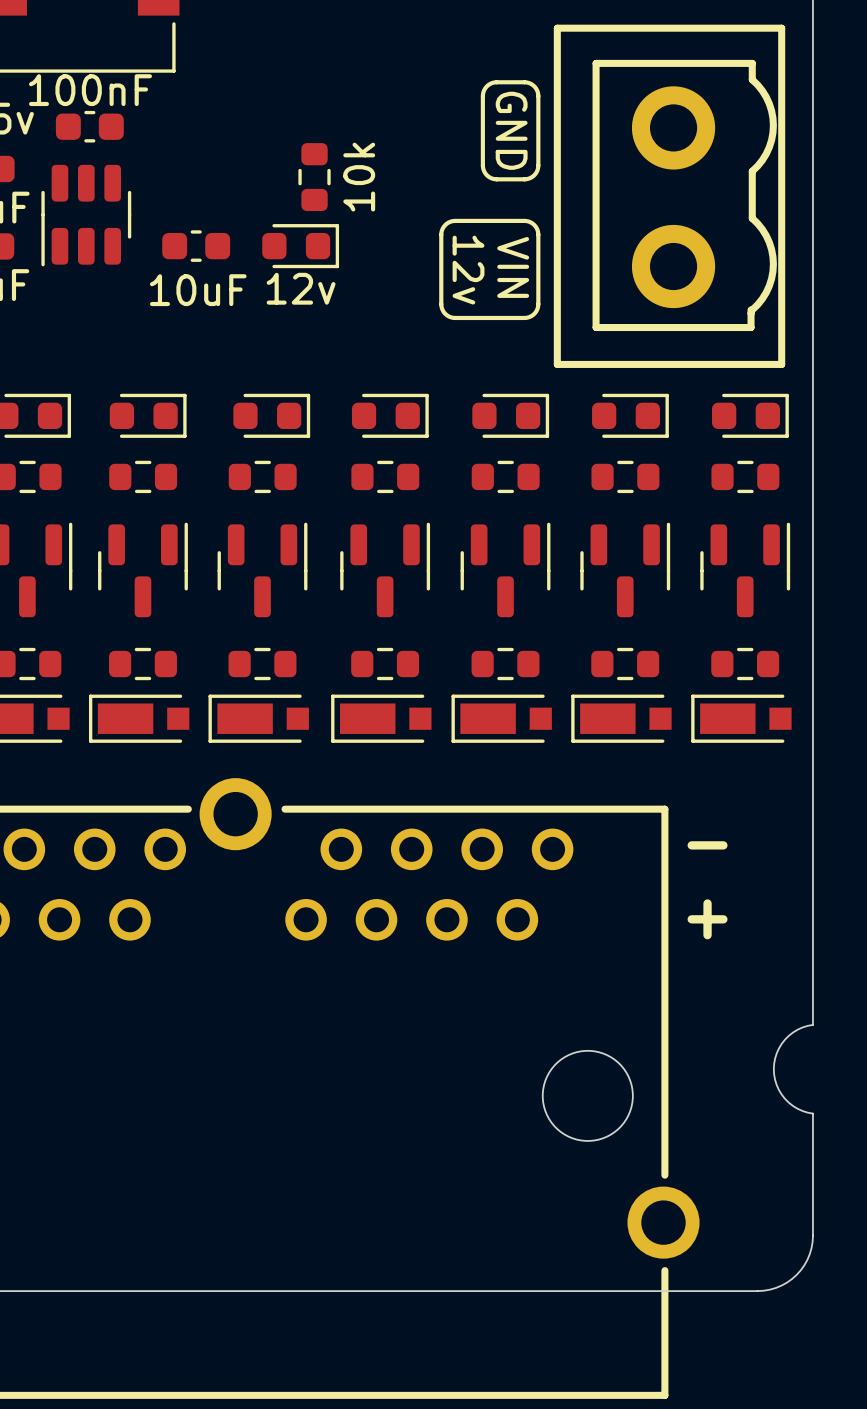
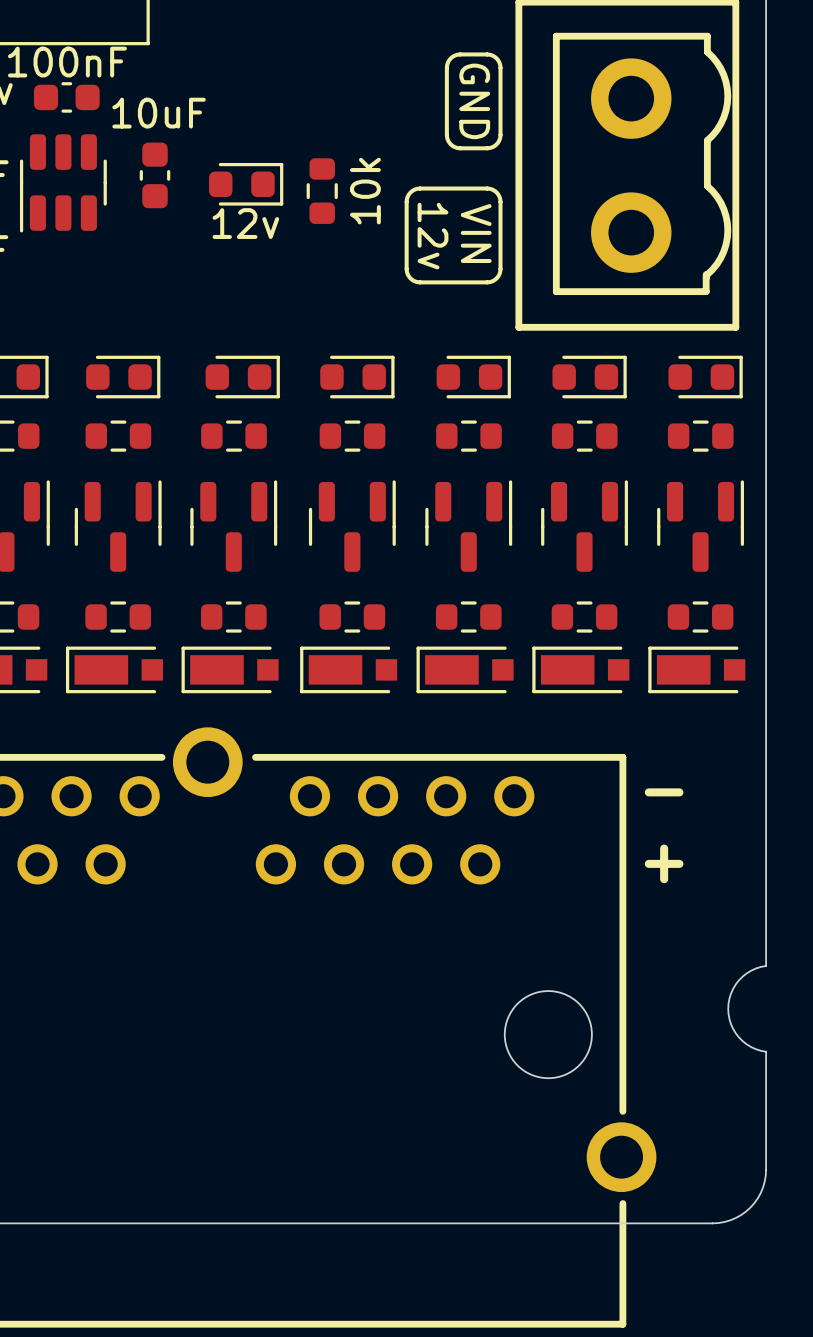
part position: (314, 177) -> (322, 191)
part: none -> (246, 184)
part rotation: 0° (196, 246) -> 90° clockwise (155, 175)
part position: (196, 246) -> (155, 175)
part: (300, 246) -> none
part value position: 10uF (198, 290) -> 10uF (159, 113)

